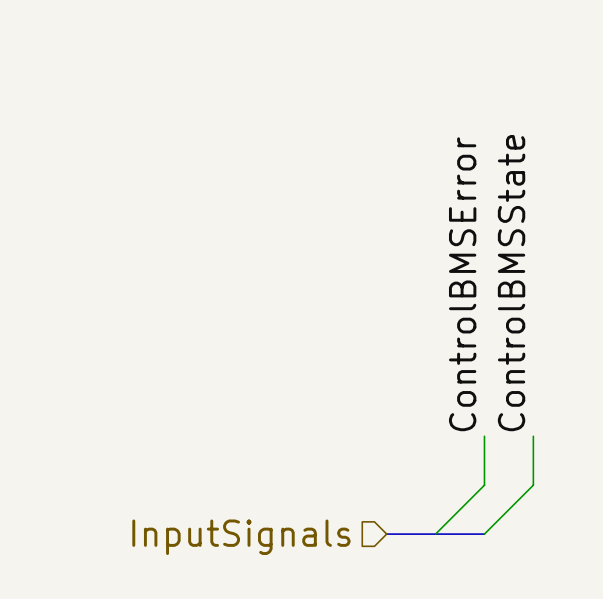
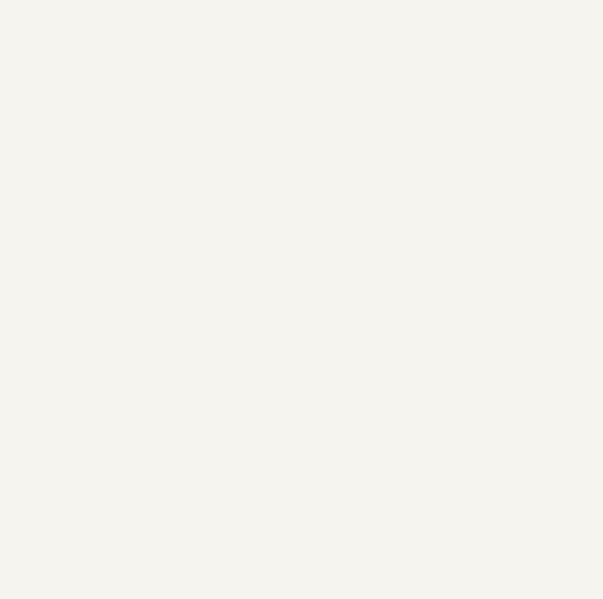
label: ControlBMSState (511, 283) -> none
label: ControlBMSError (462, 284) -> none
wire: (484, 436) (484, 485) (435, 534) -> none
wire: (533, 436) (533, 485) (484, 534) -> none
bus: (386, 534) (484, 534) -> none
hierarchical label: InputSignals (241, 537) -> none

